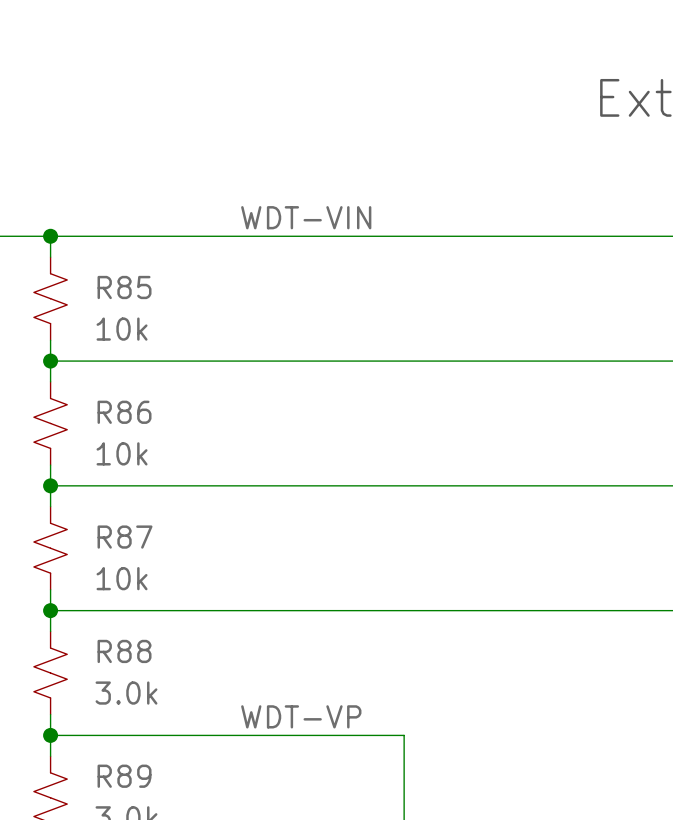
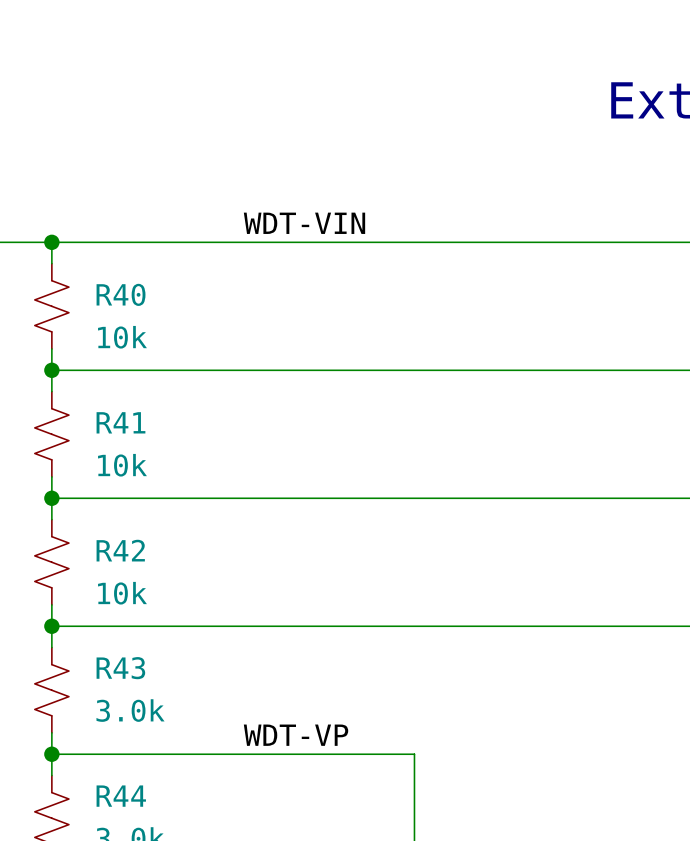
R85 name: R85 (124, 287) -> R40 (121, 294)
R86 name: R86 (124, 412) -> R41 (120, 422)
R87 name: R87 (125, 537) -> R42 (120, 550)
R88 name: R88 (124, 651) -> R43 (120, 668)
R89 name: R89 (124, 776) -> R44 (121, 796)

